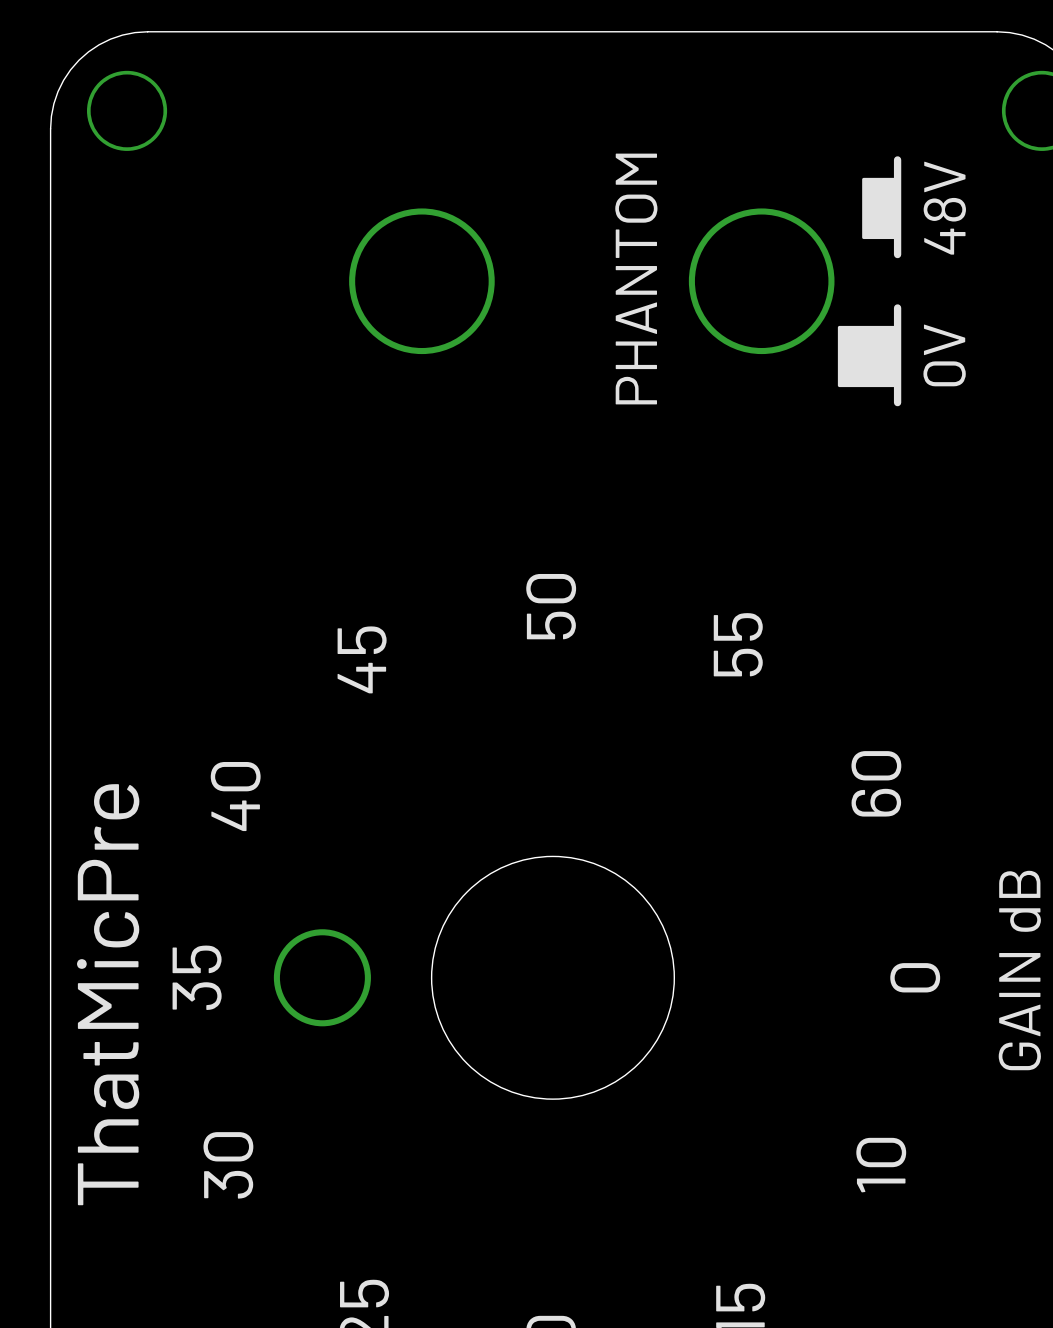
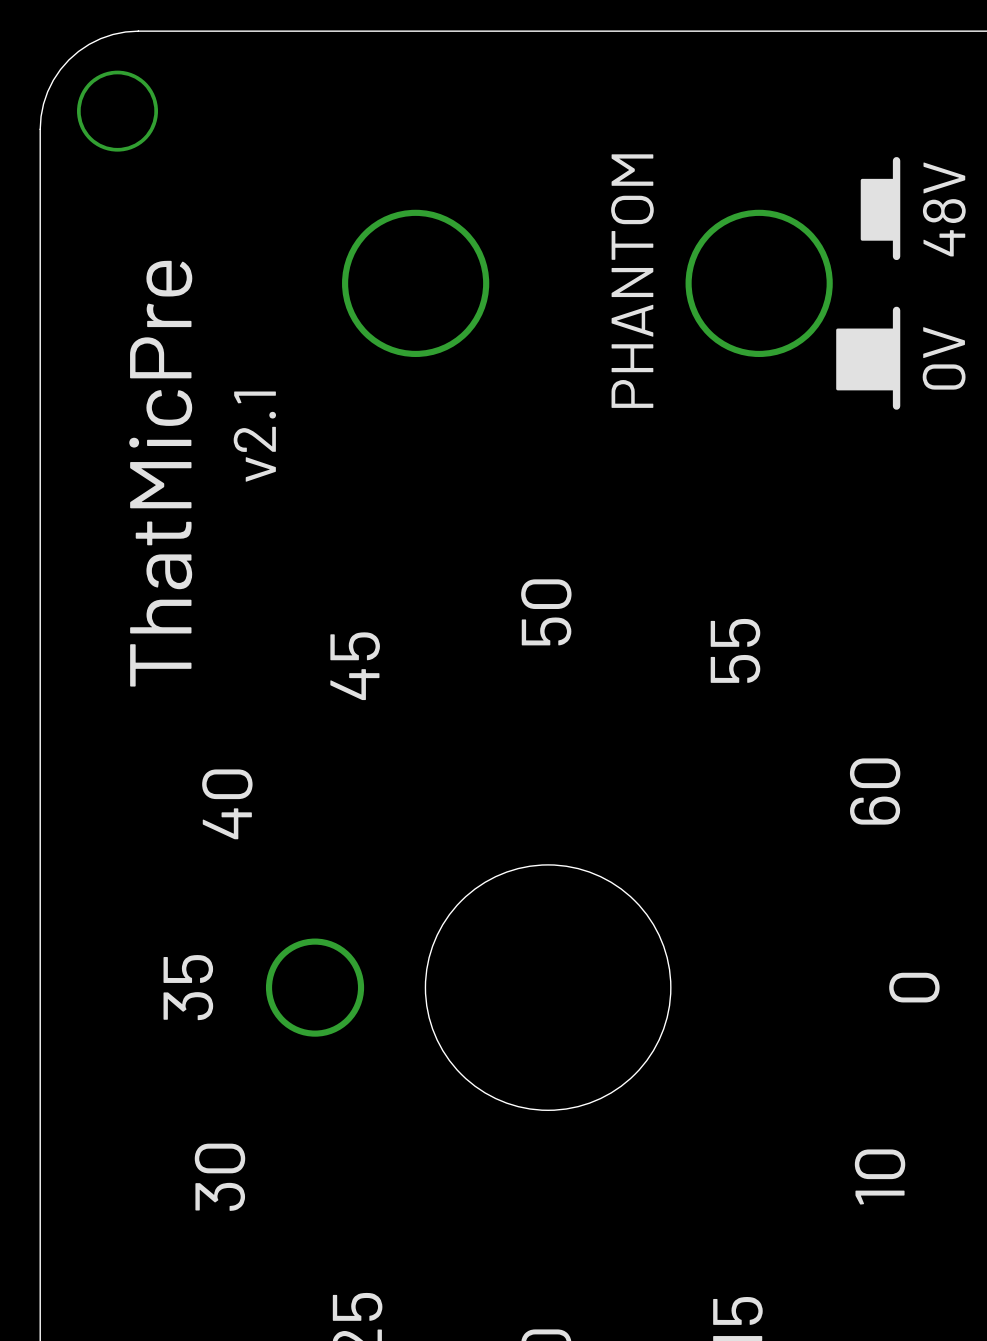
text: none -> v2.1 (254, 436)
text position: ThatMicPre (108, 994) -> ThatMicPre (160, 473)

